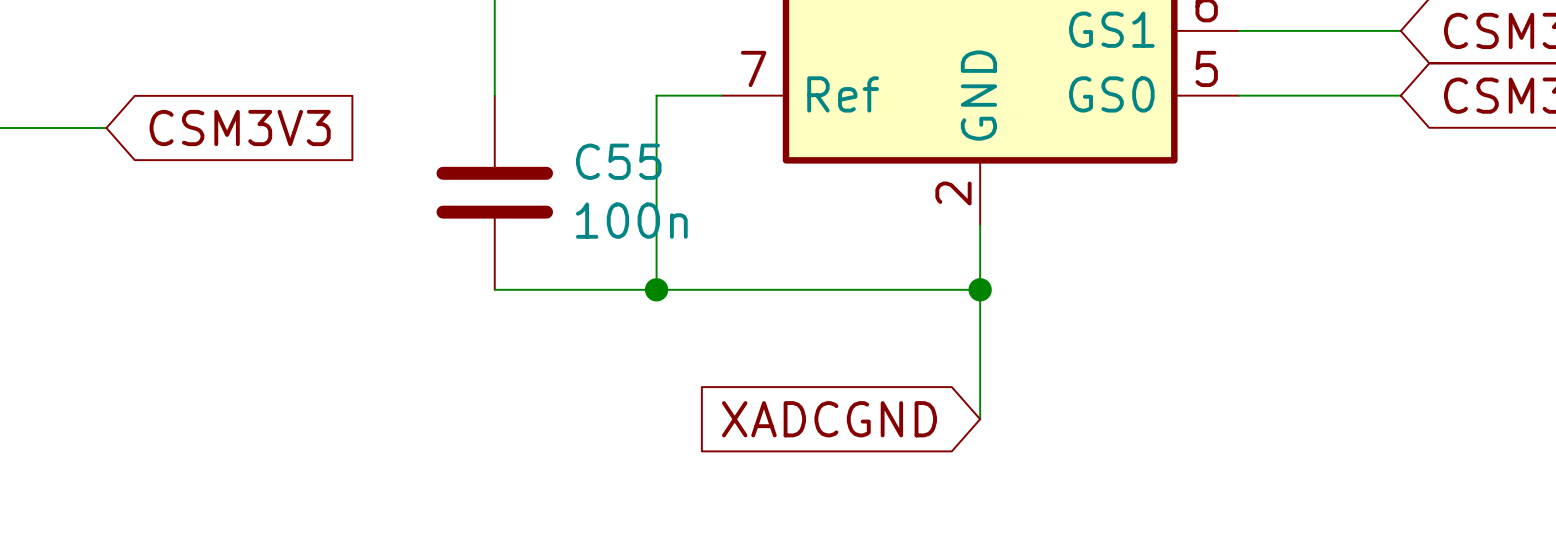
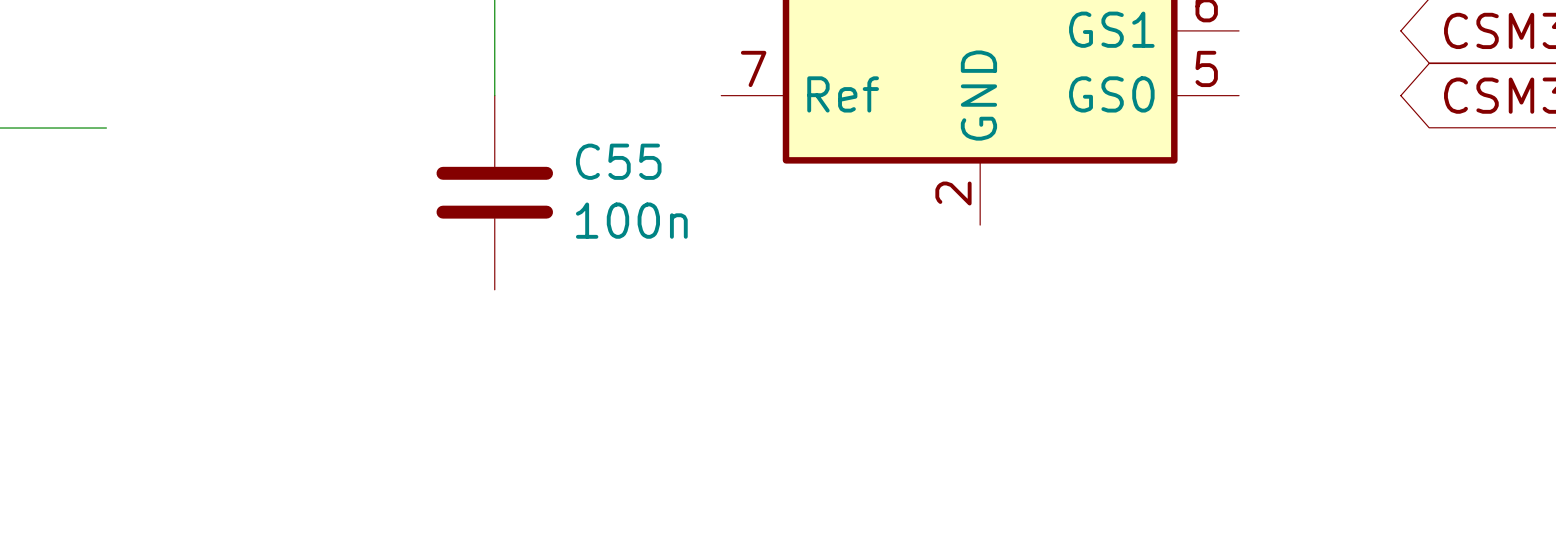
wire: (1239, 30) (1400, 30) -> none
wire: (721, 95) (656, 95) (656, 289) -> none
wire: (1239, 95) (1400, 95) -> none
global label: CSM3V3 (240, 128) -> none
wire: (980, 225) (980, 419) -> none
wire: (494, 289) (980, 289) -> none
junction: (656, 289) -> none
junction: (980, 289) -> none
global label: XADCGND (829, 419) -> none

